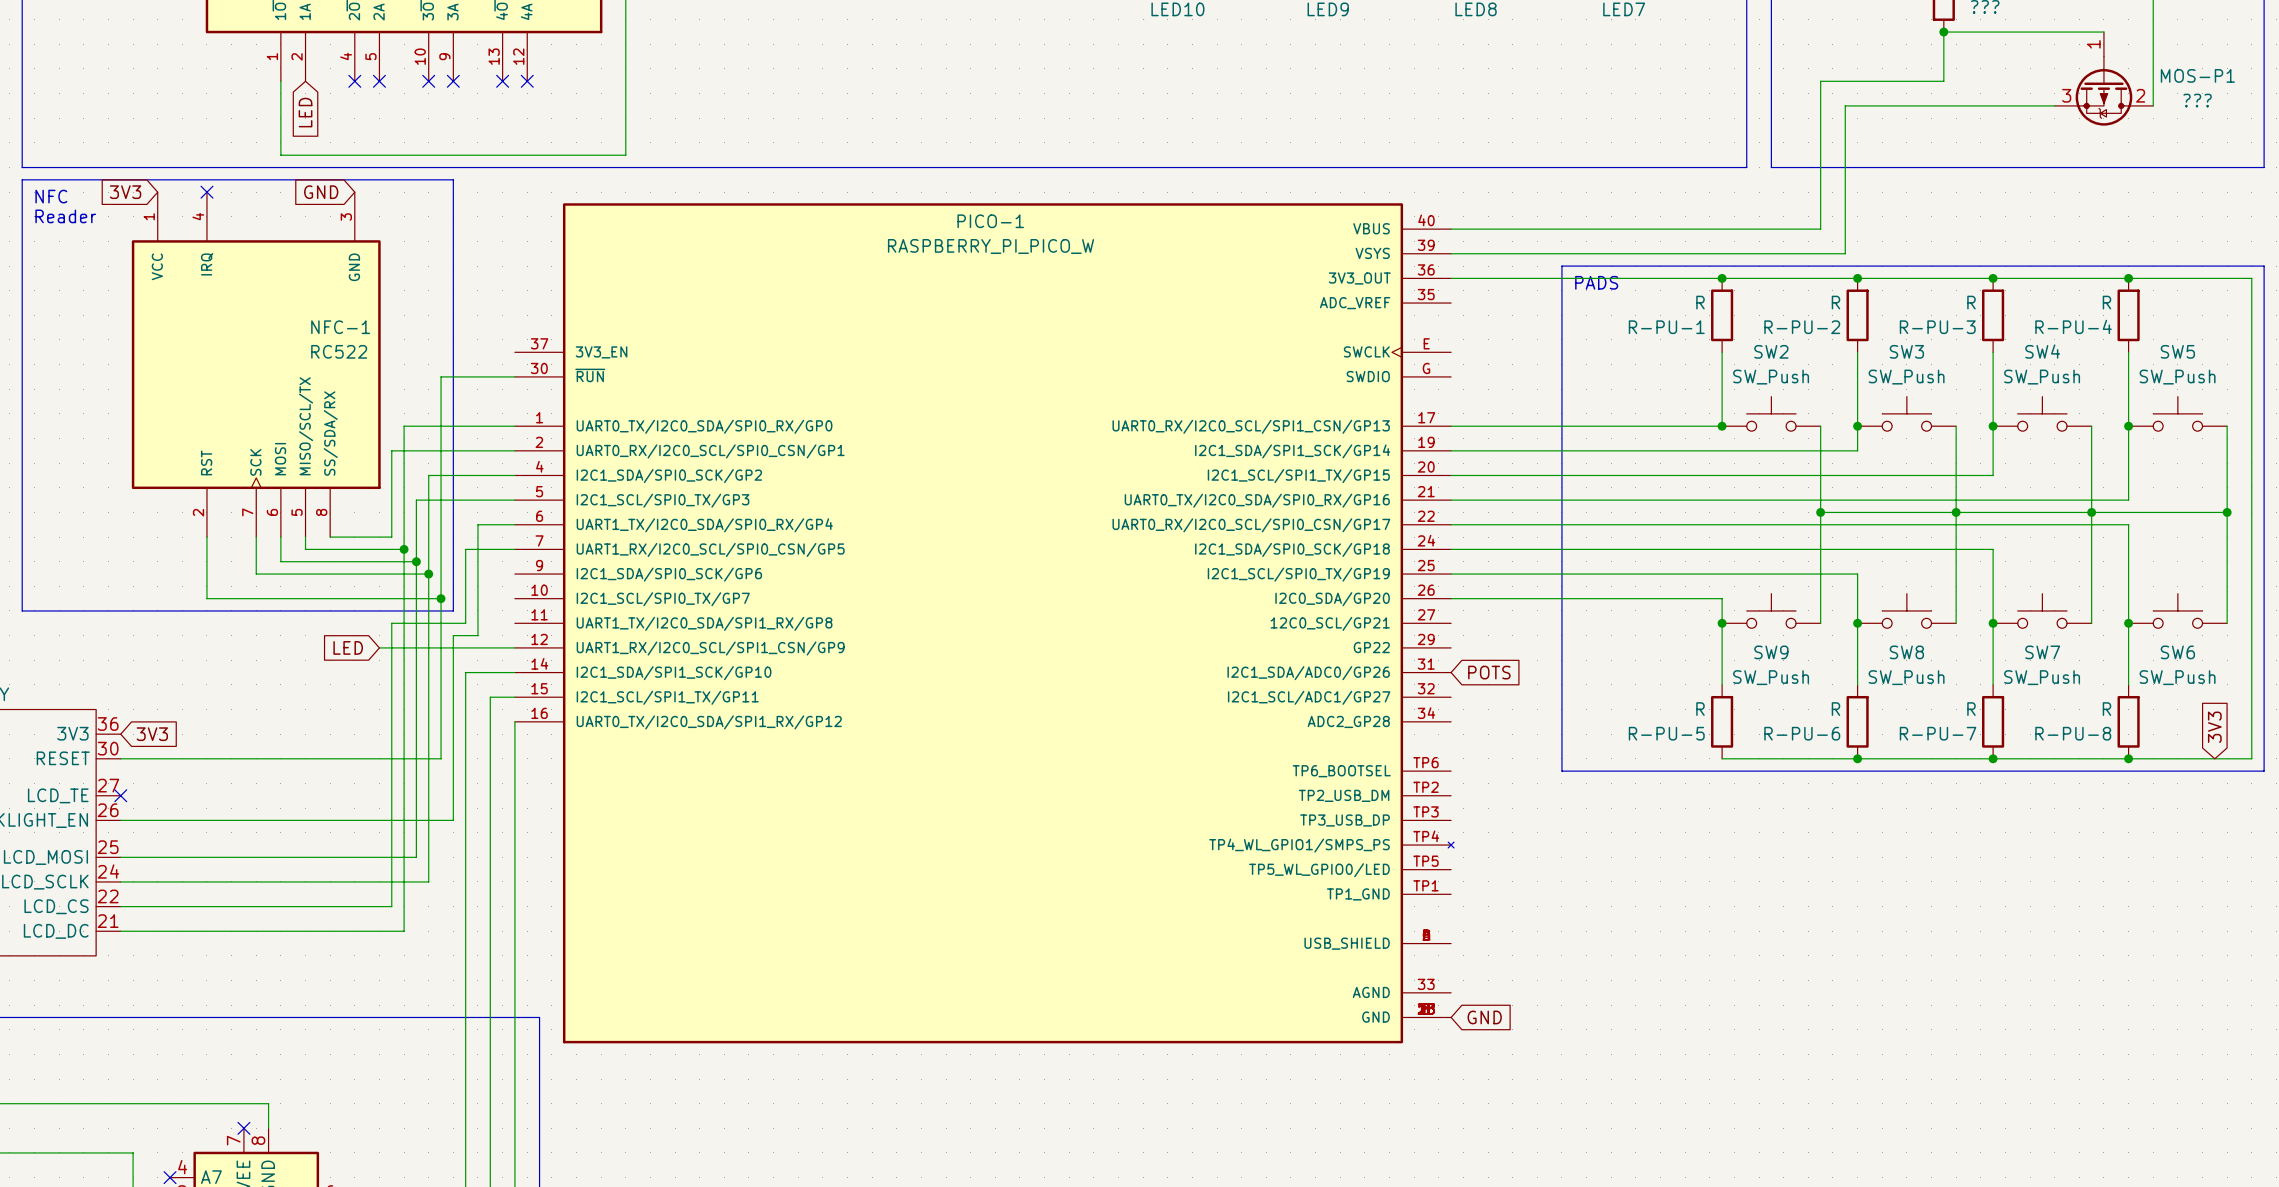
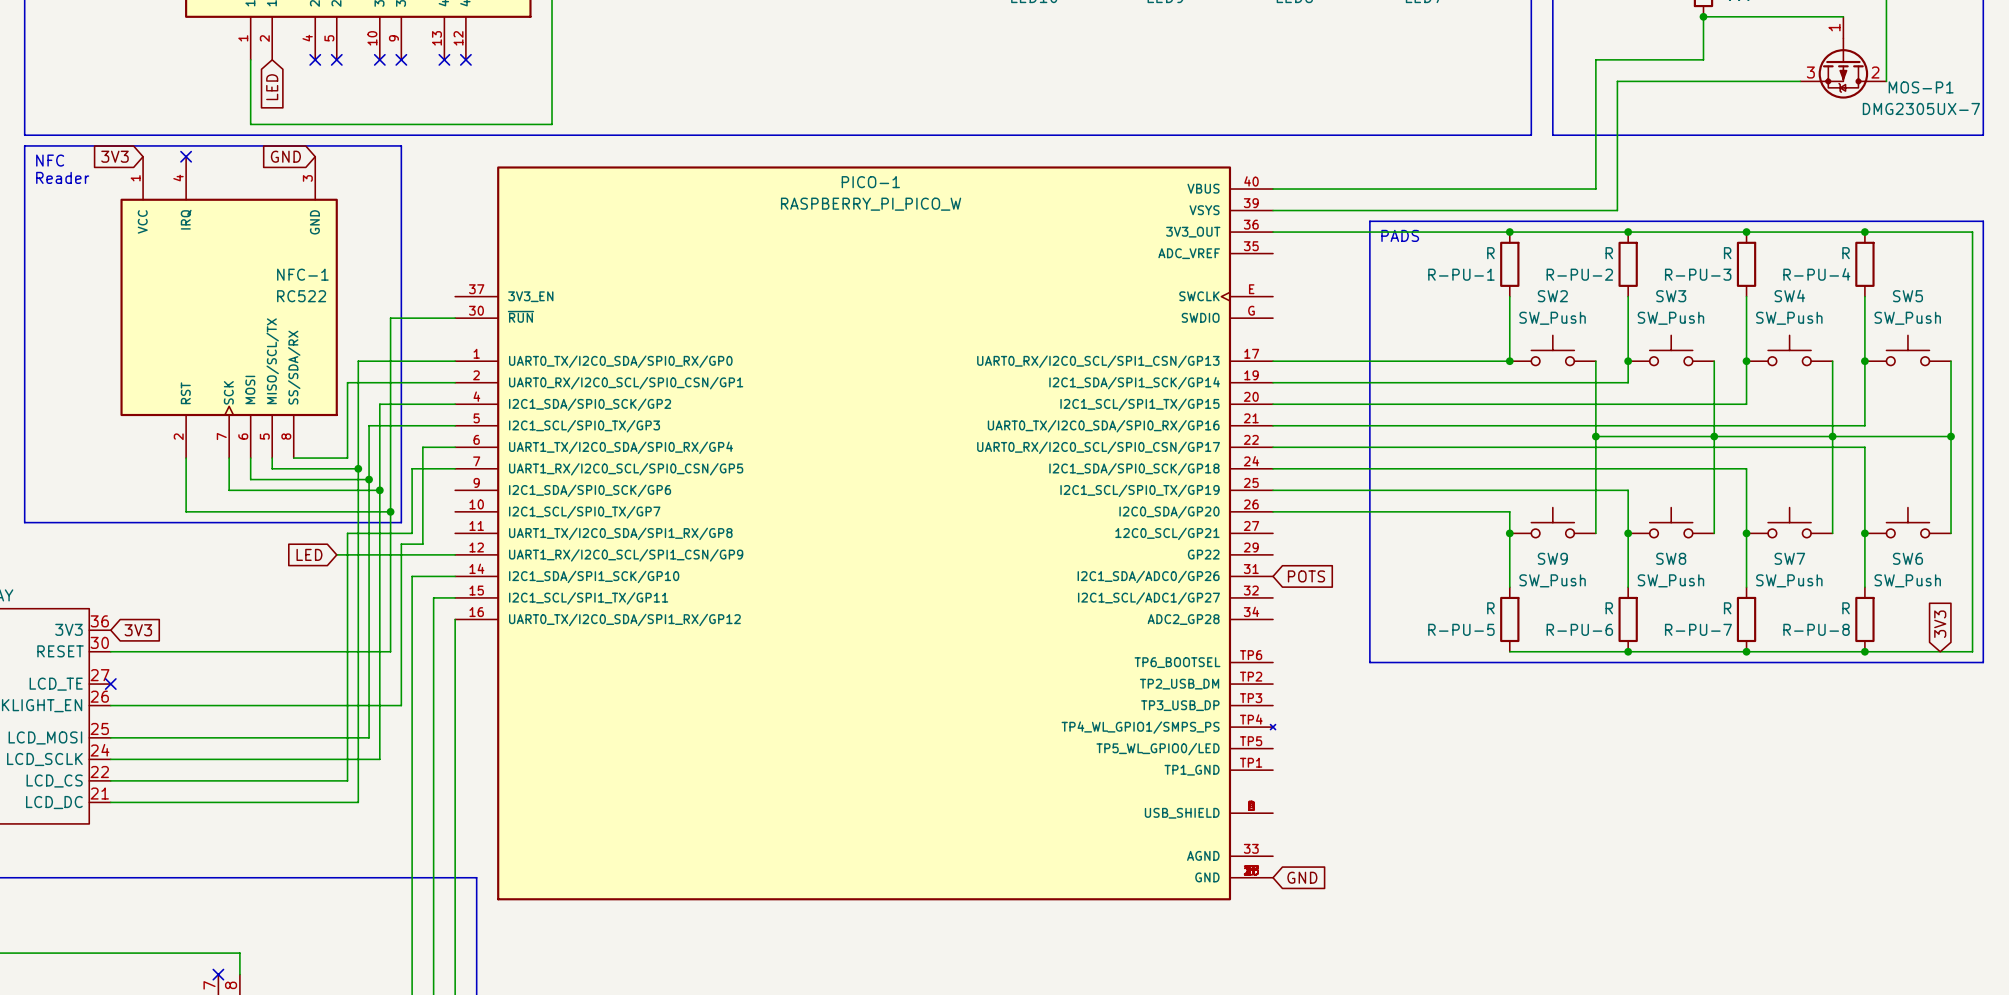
MOS-P1 name position: MOS-P1 (2197, 75) -> MOS-P1 (1921, 87)
MOS-P1 value: ??? (2197, 100) -> DMG2305UX-7 (1921, 108)

